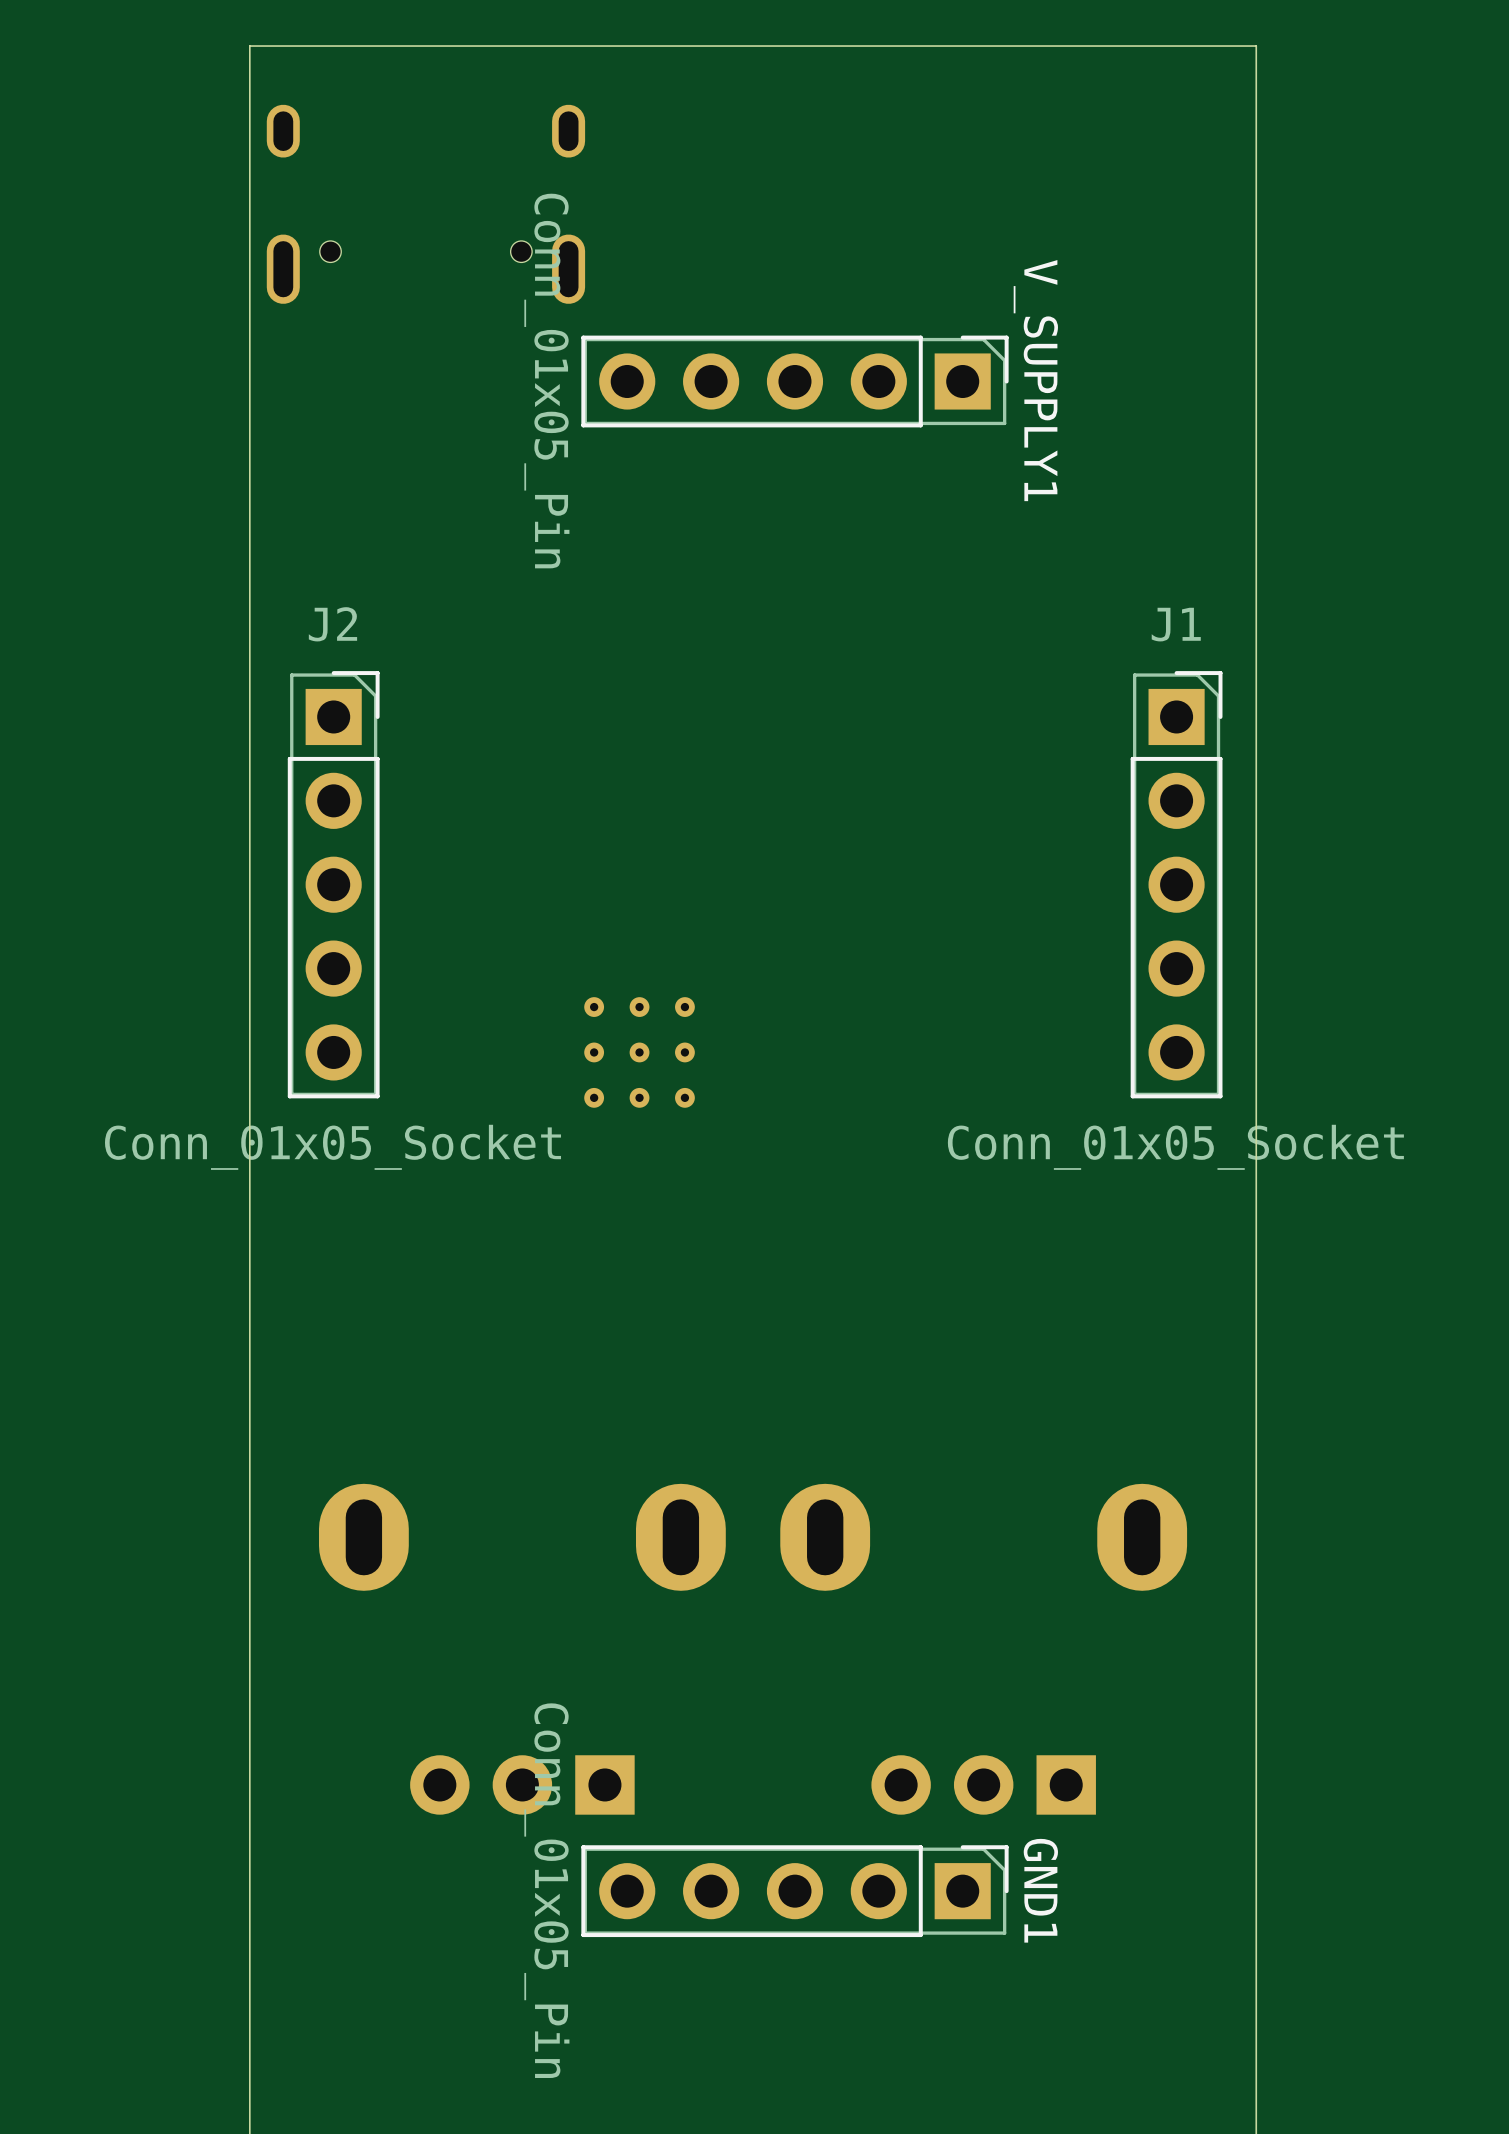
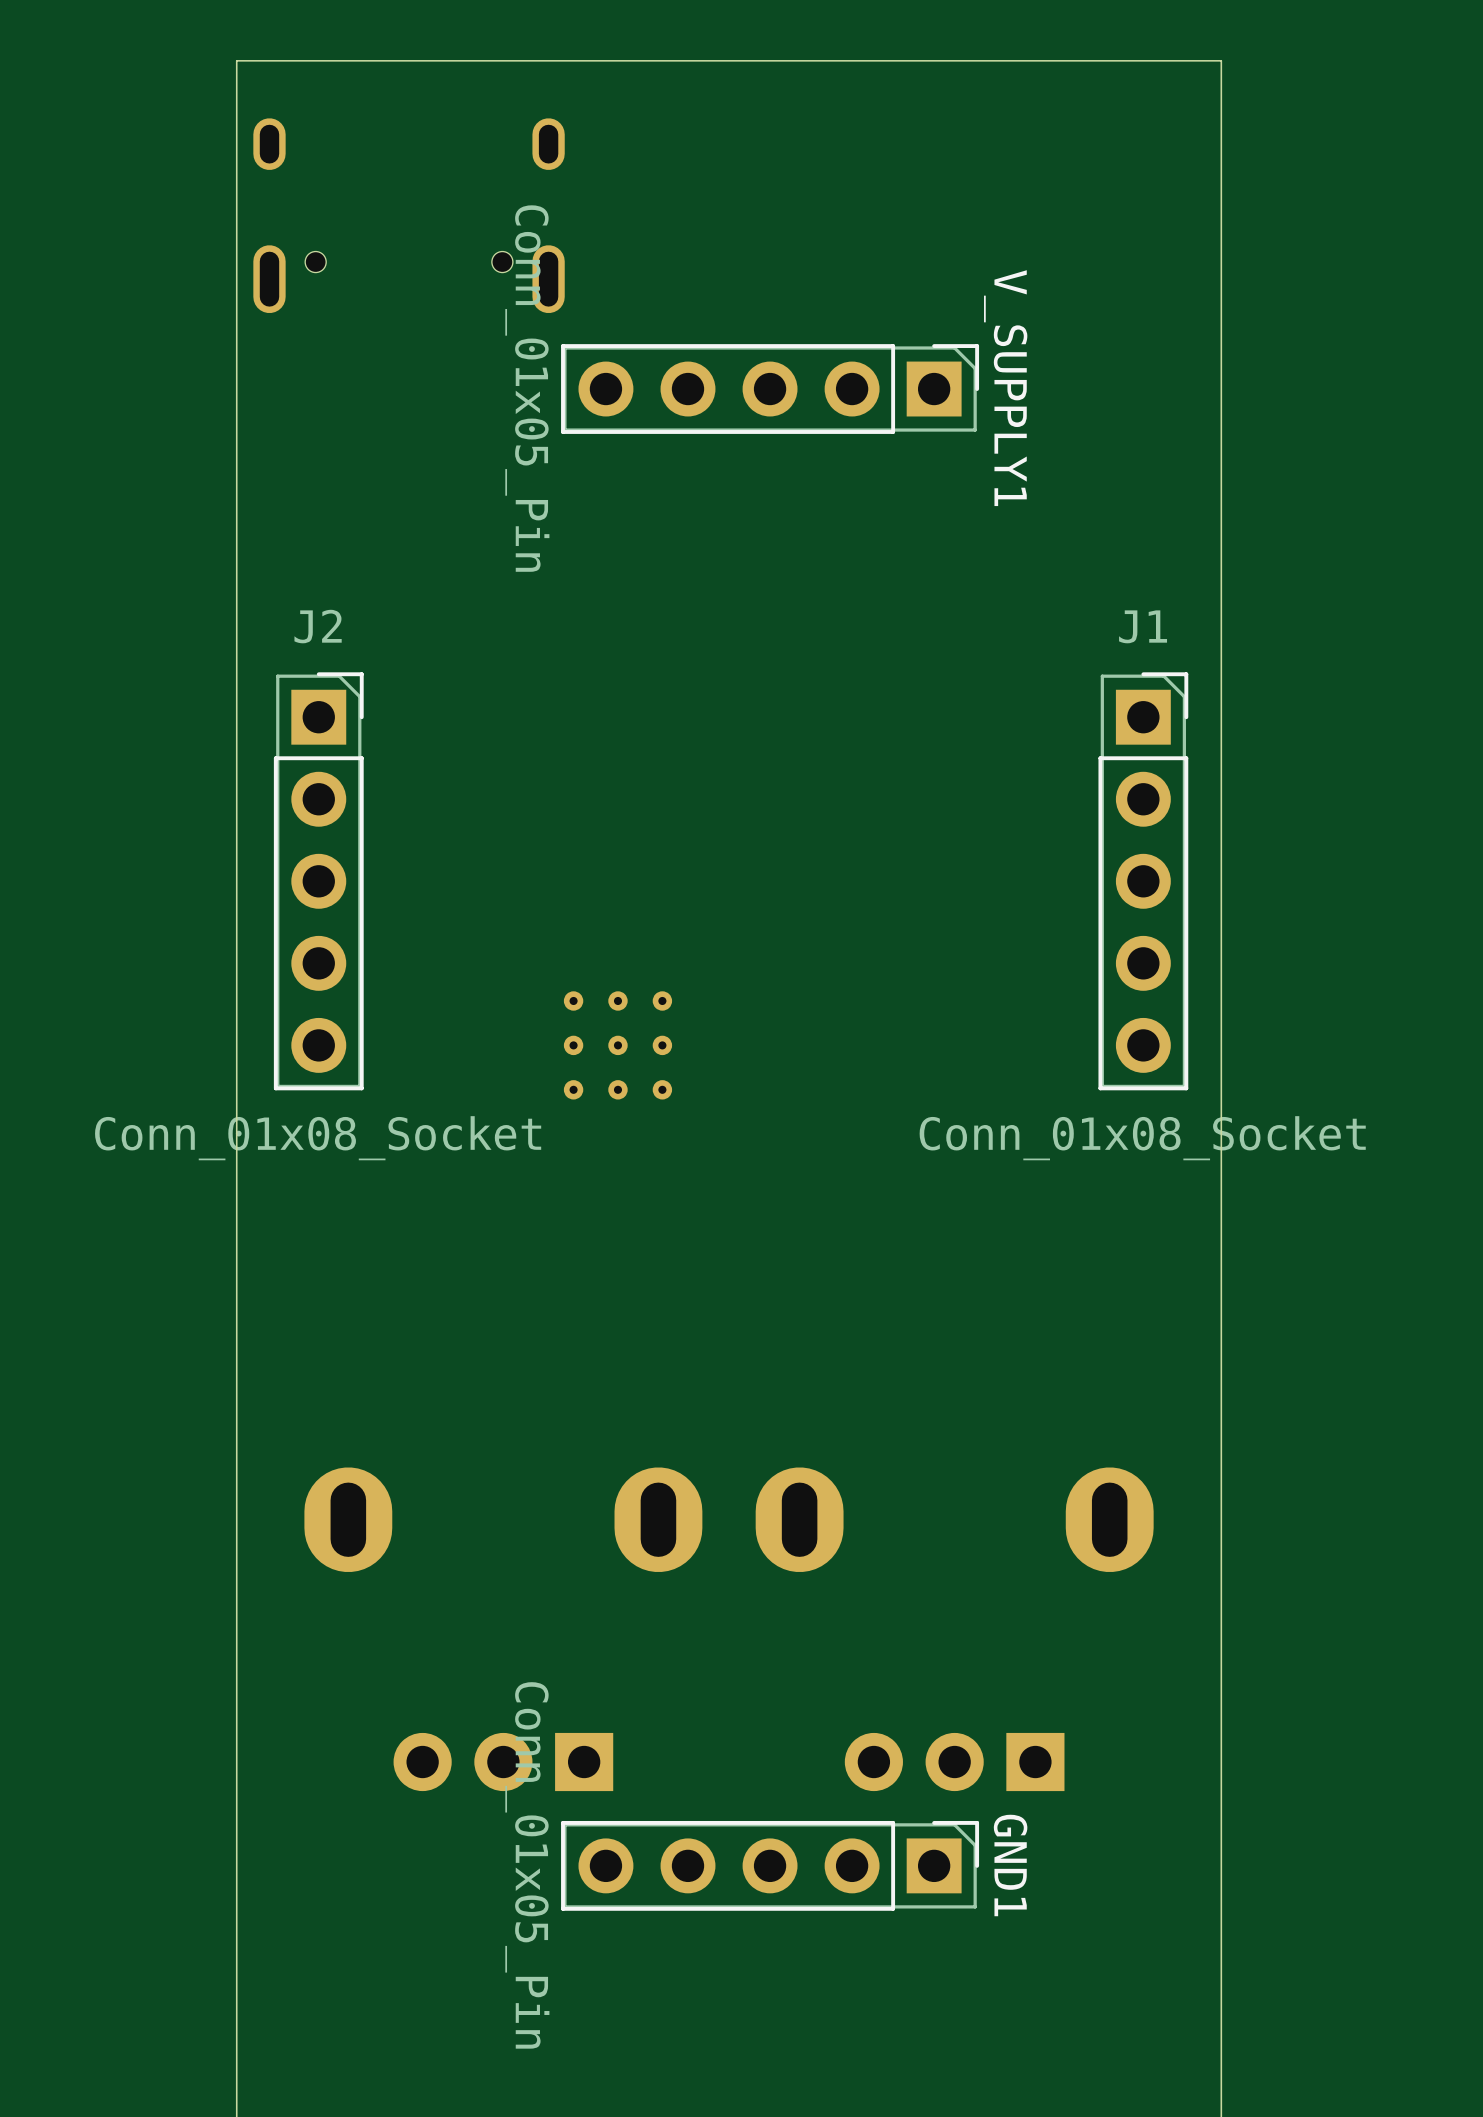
J2 value: Conn_01x05_Socket (333, 1147) -> Conn_01x08_Socket (318, 1138)
J1 value: Conn_01x05_Socket (1175, 1147) -> Conn_01x08_Socket (1142, 1138)

